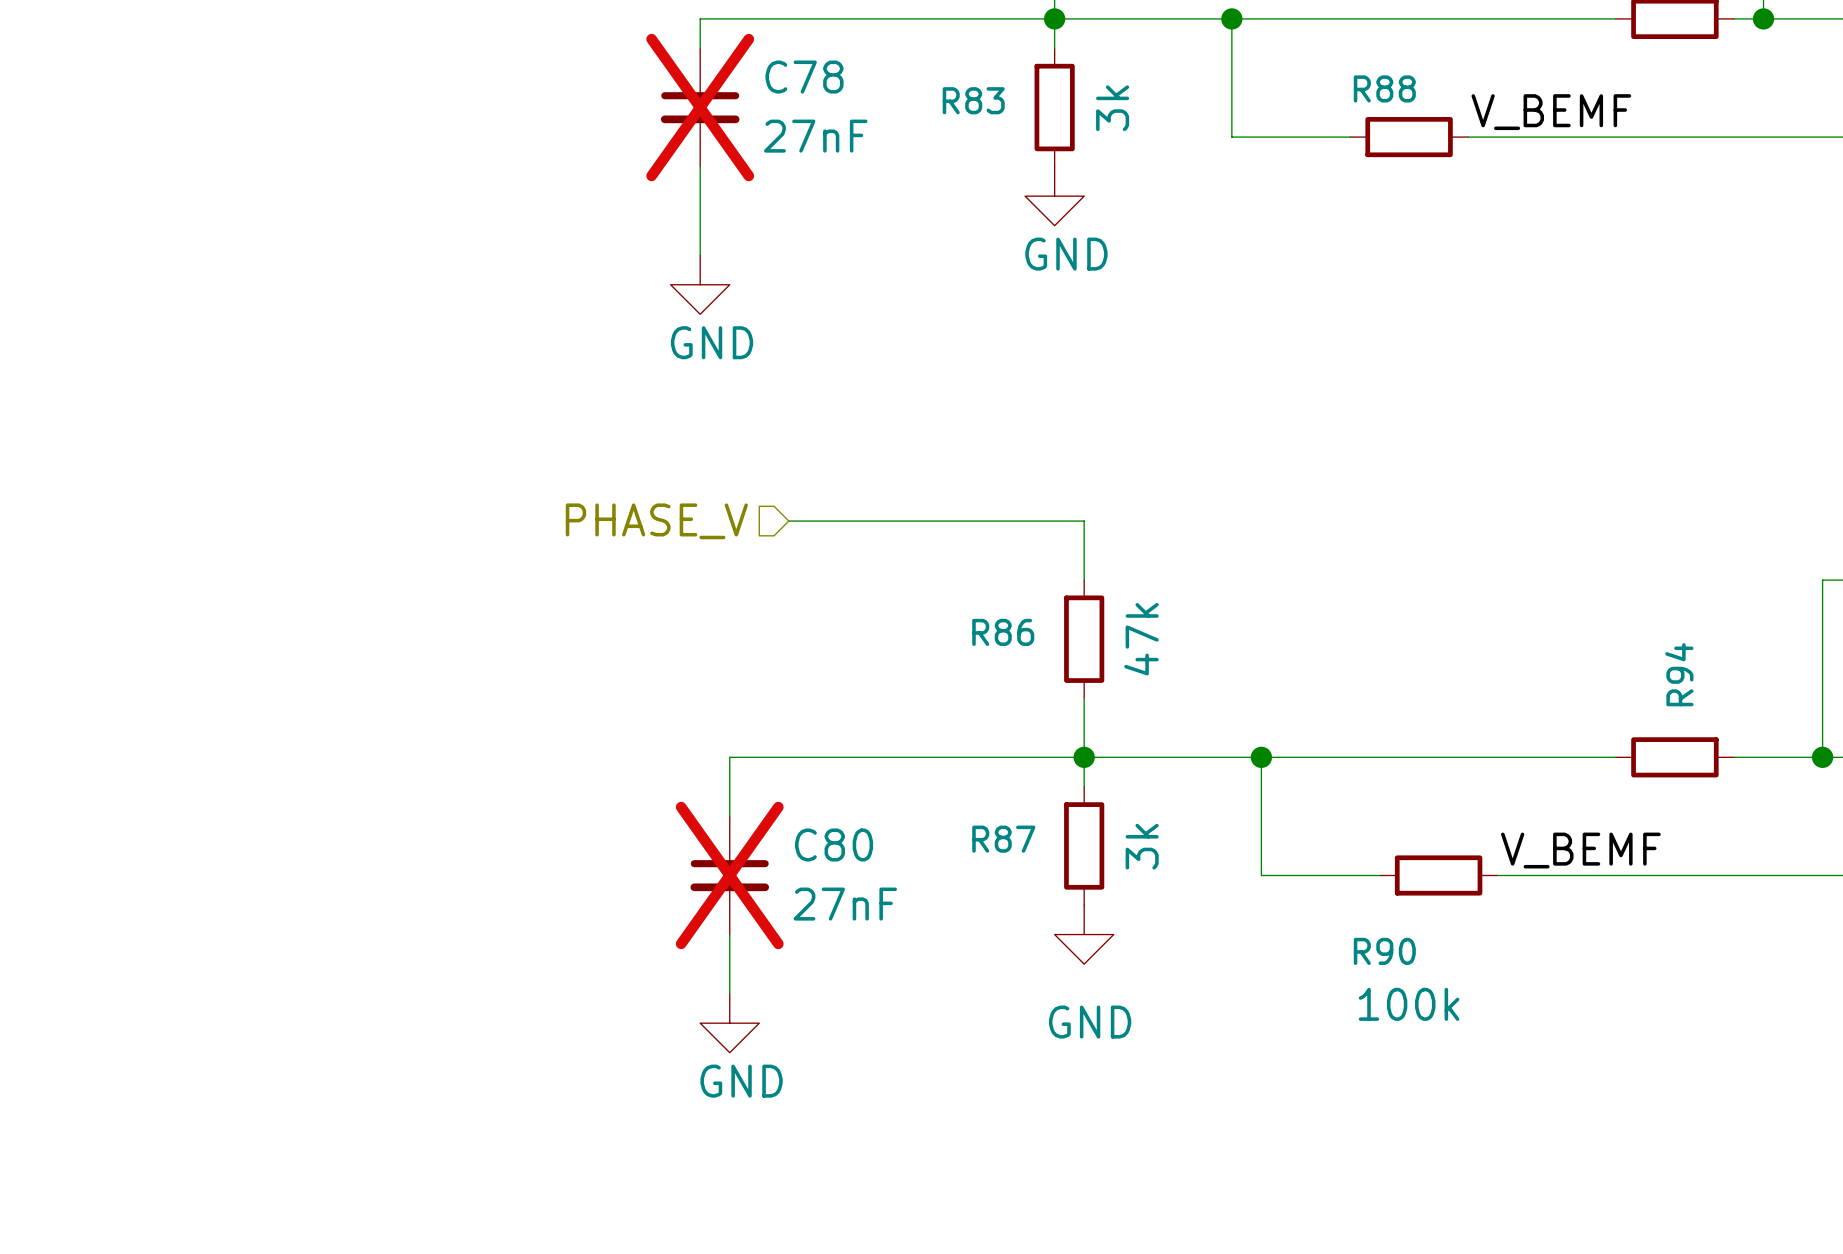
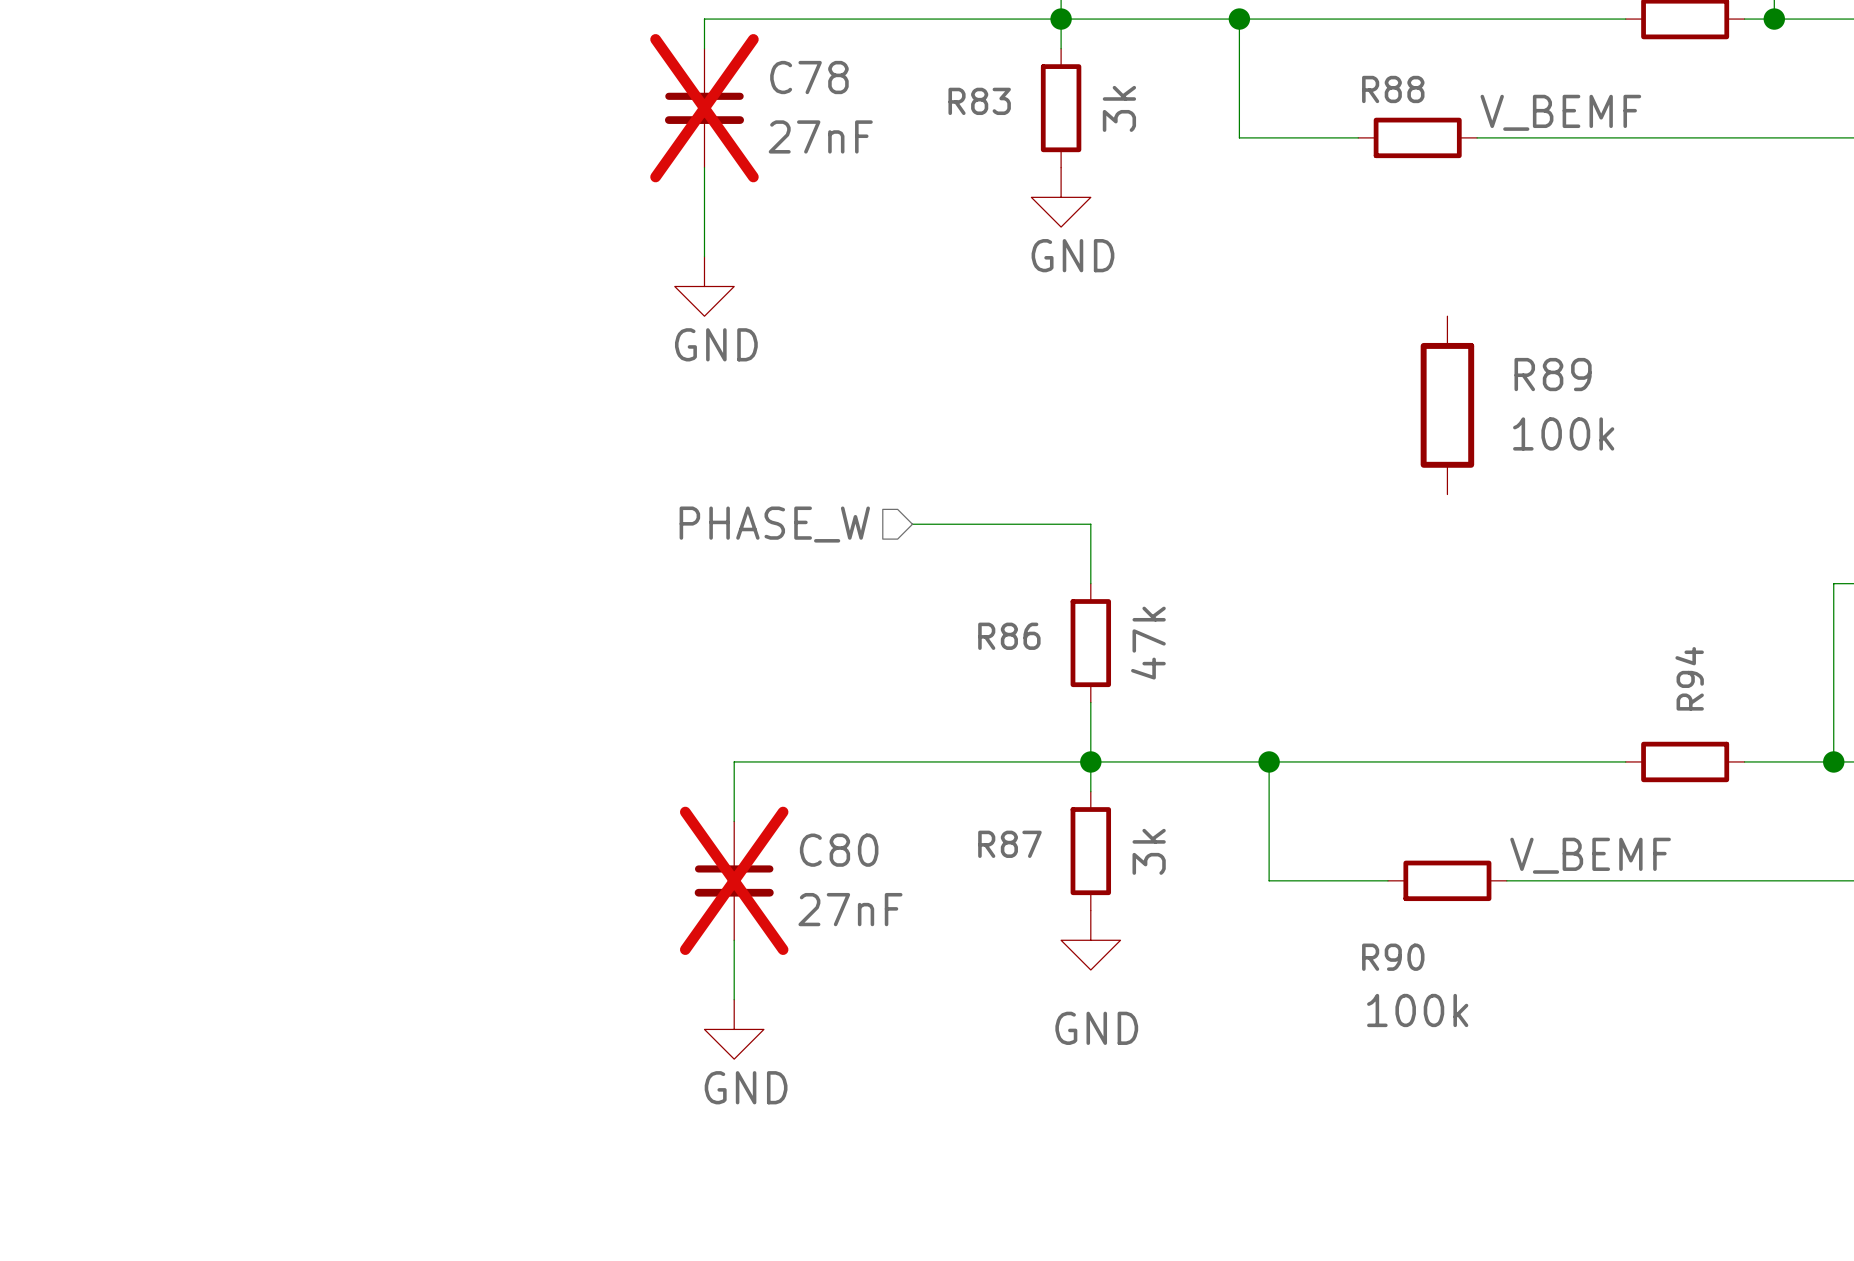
R89: none -> 100k (1447, 405)
hierarchical label: PHASE_V (656, 521) -> PHASE_W (774, 524)
wire: (788, 521) (906, 521) -> none

